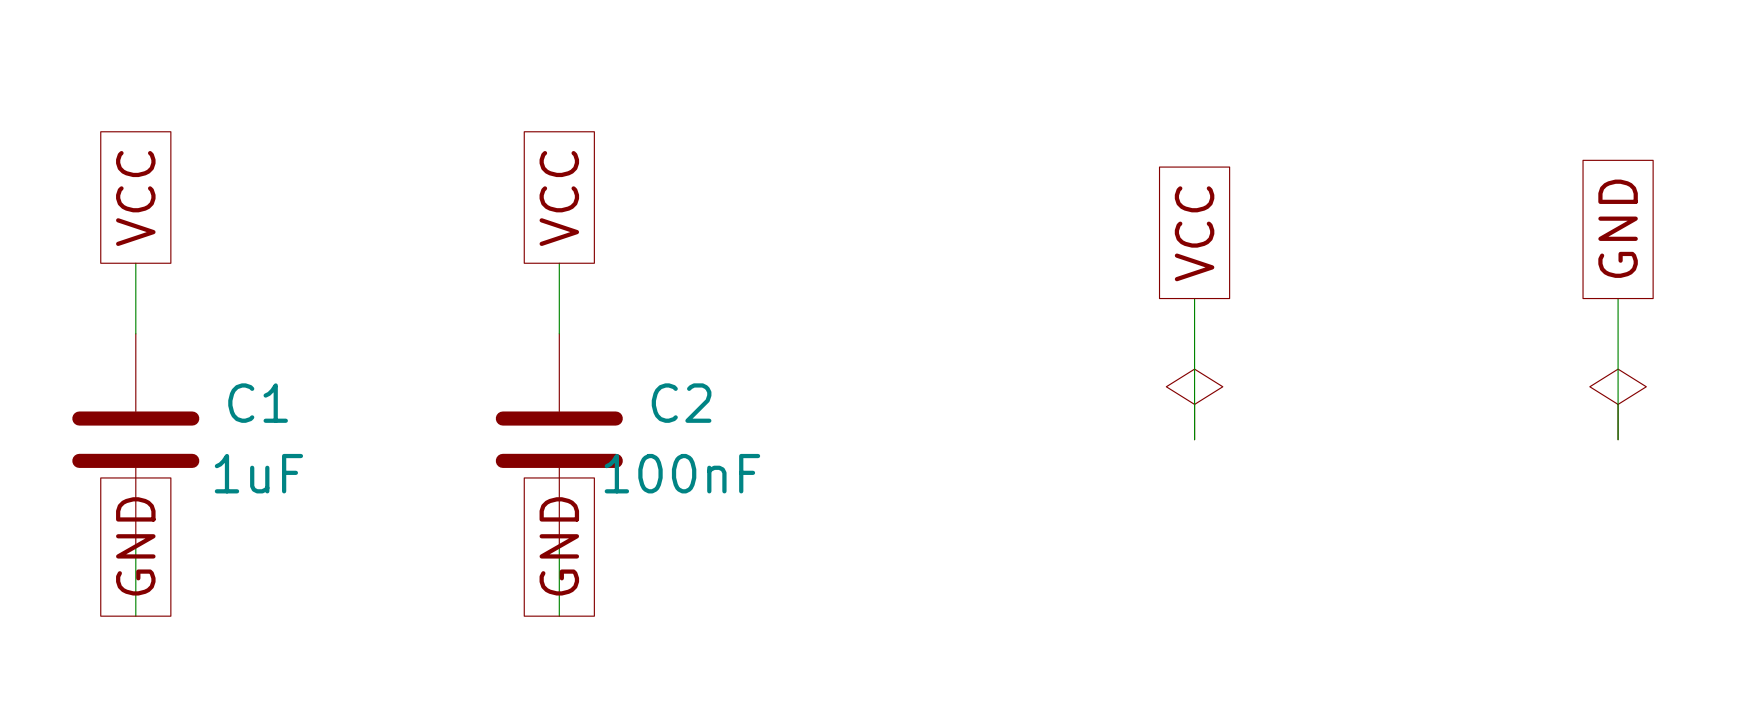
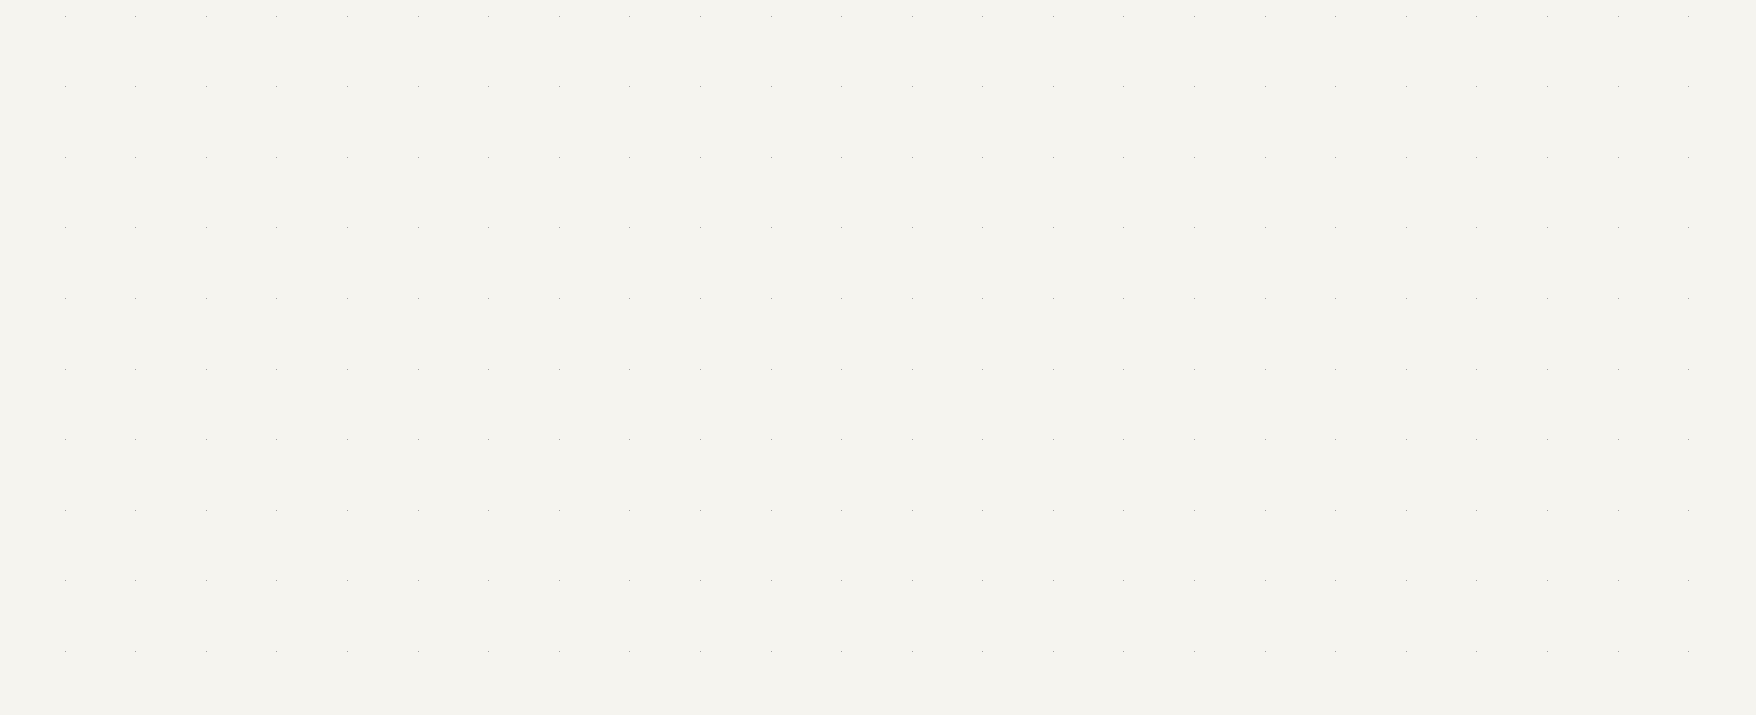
global label: VCC (135, 198) -> none
global label: VCC (559, 198) -> none
global label: GND (1618, 228) -> none
global label: VCC (1194, 233) -> none
wire: (135, 263) (135, 333) -> none
wire: (559, 263) (559, 333) -> none
wire: (1194, 298) (1194, 439) -> none
wire: (1618, 298) (1618, 439) -> none
power symbol: (1194, 404) -> none
power symbol: (1618, 404) -> none
C1: 1uF (135, 439) -> none
C2: 100nF (559, 439) -> none
wire: (135, 545) (135, 616) -> none
wire: (559, 545) (559, 616) -> none
global label: GND (135, 546) -> none
global label: GND (559, 546) -> none

